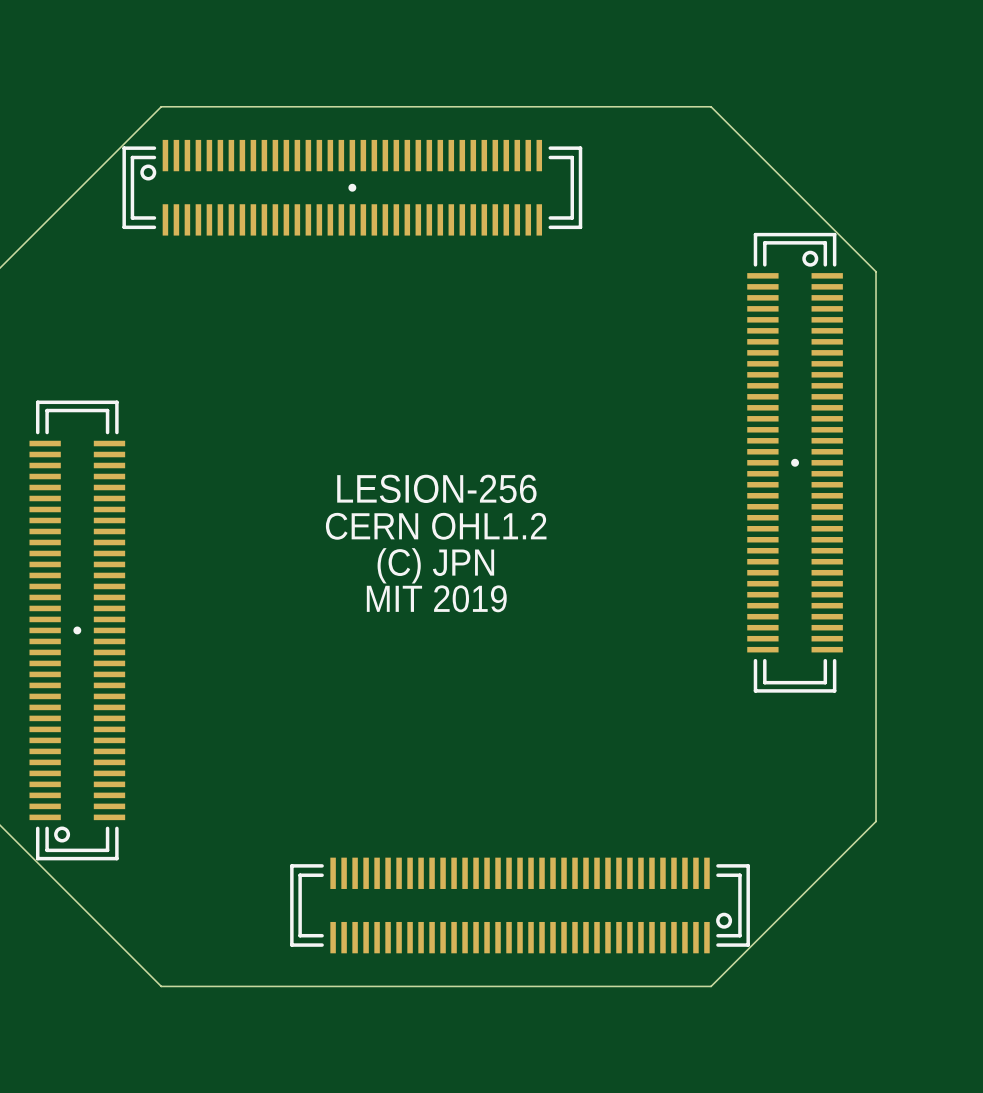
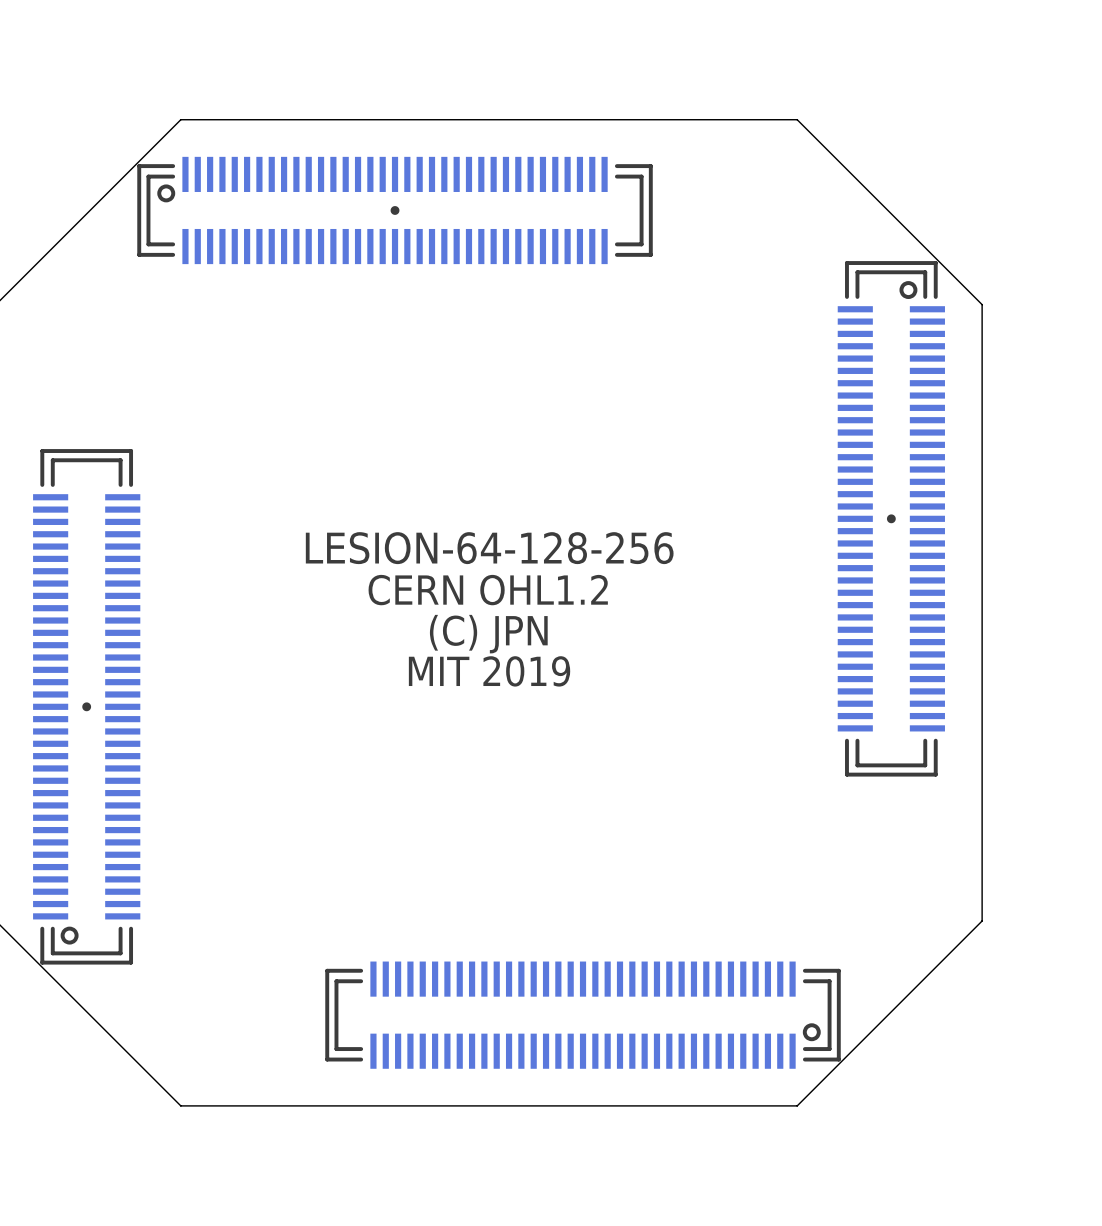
text: LESION-256 (436, 488) -> LESION-64-128-256 (489, 548)

